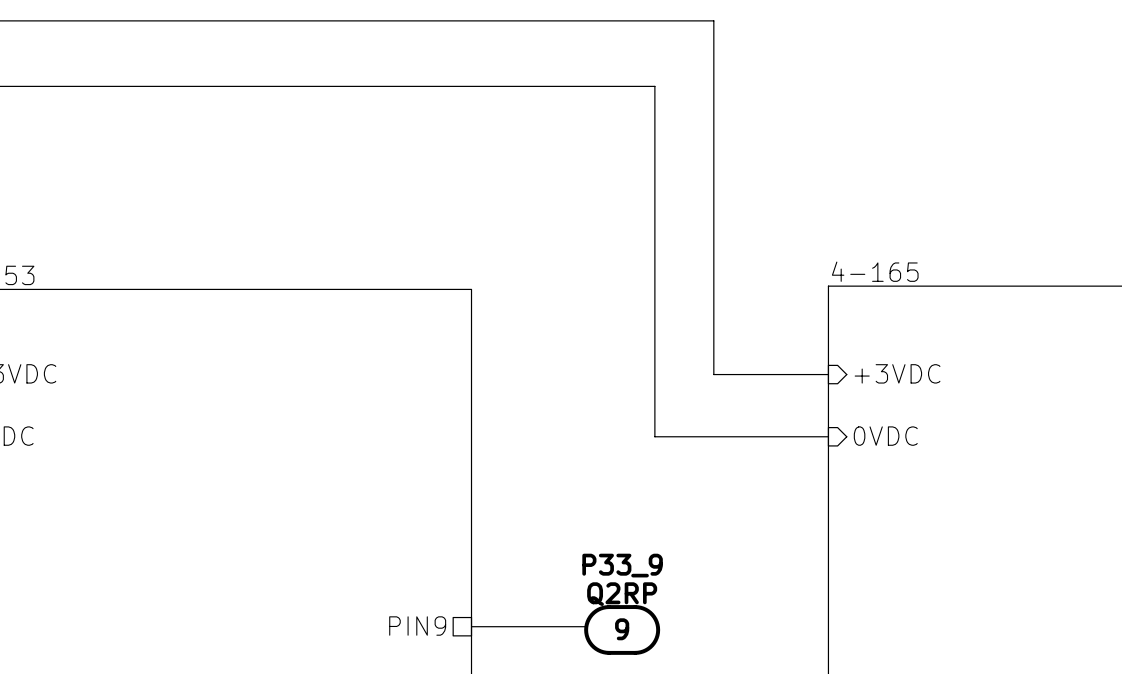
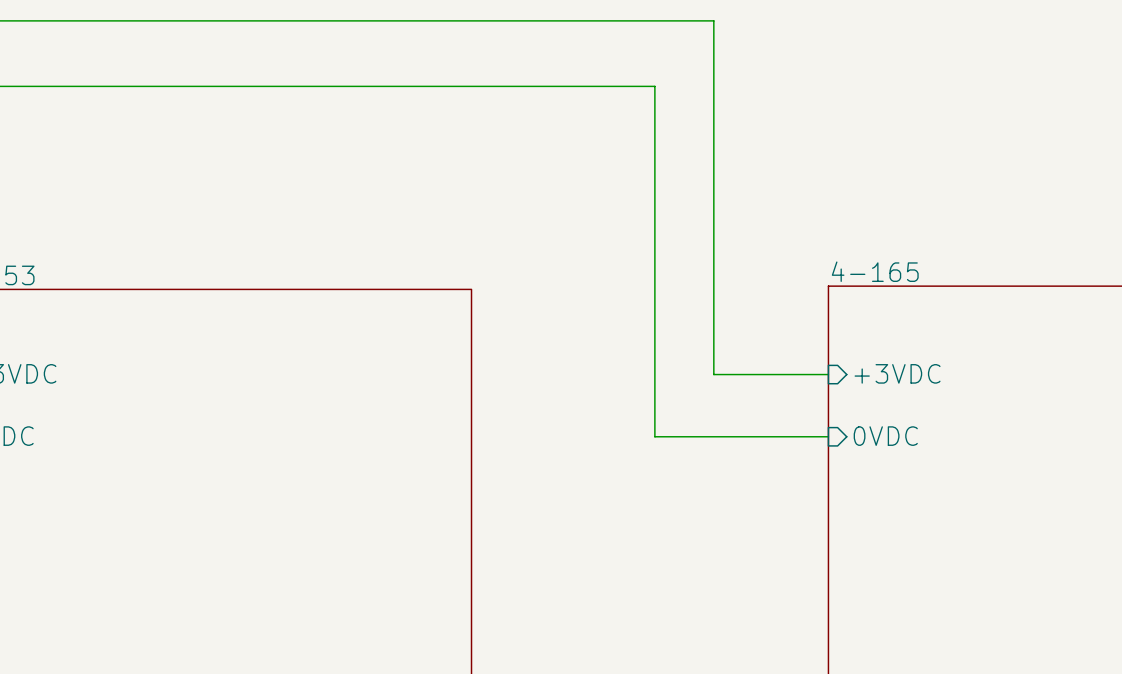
sheet pin: PIN9 (417, 626) -> none
wire: (471, 626) (586, 626) (586, 629) -> none
part: (622, 629) -> none

